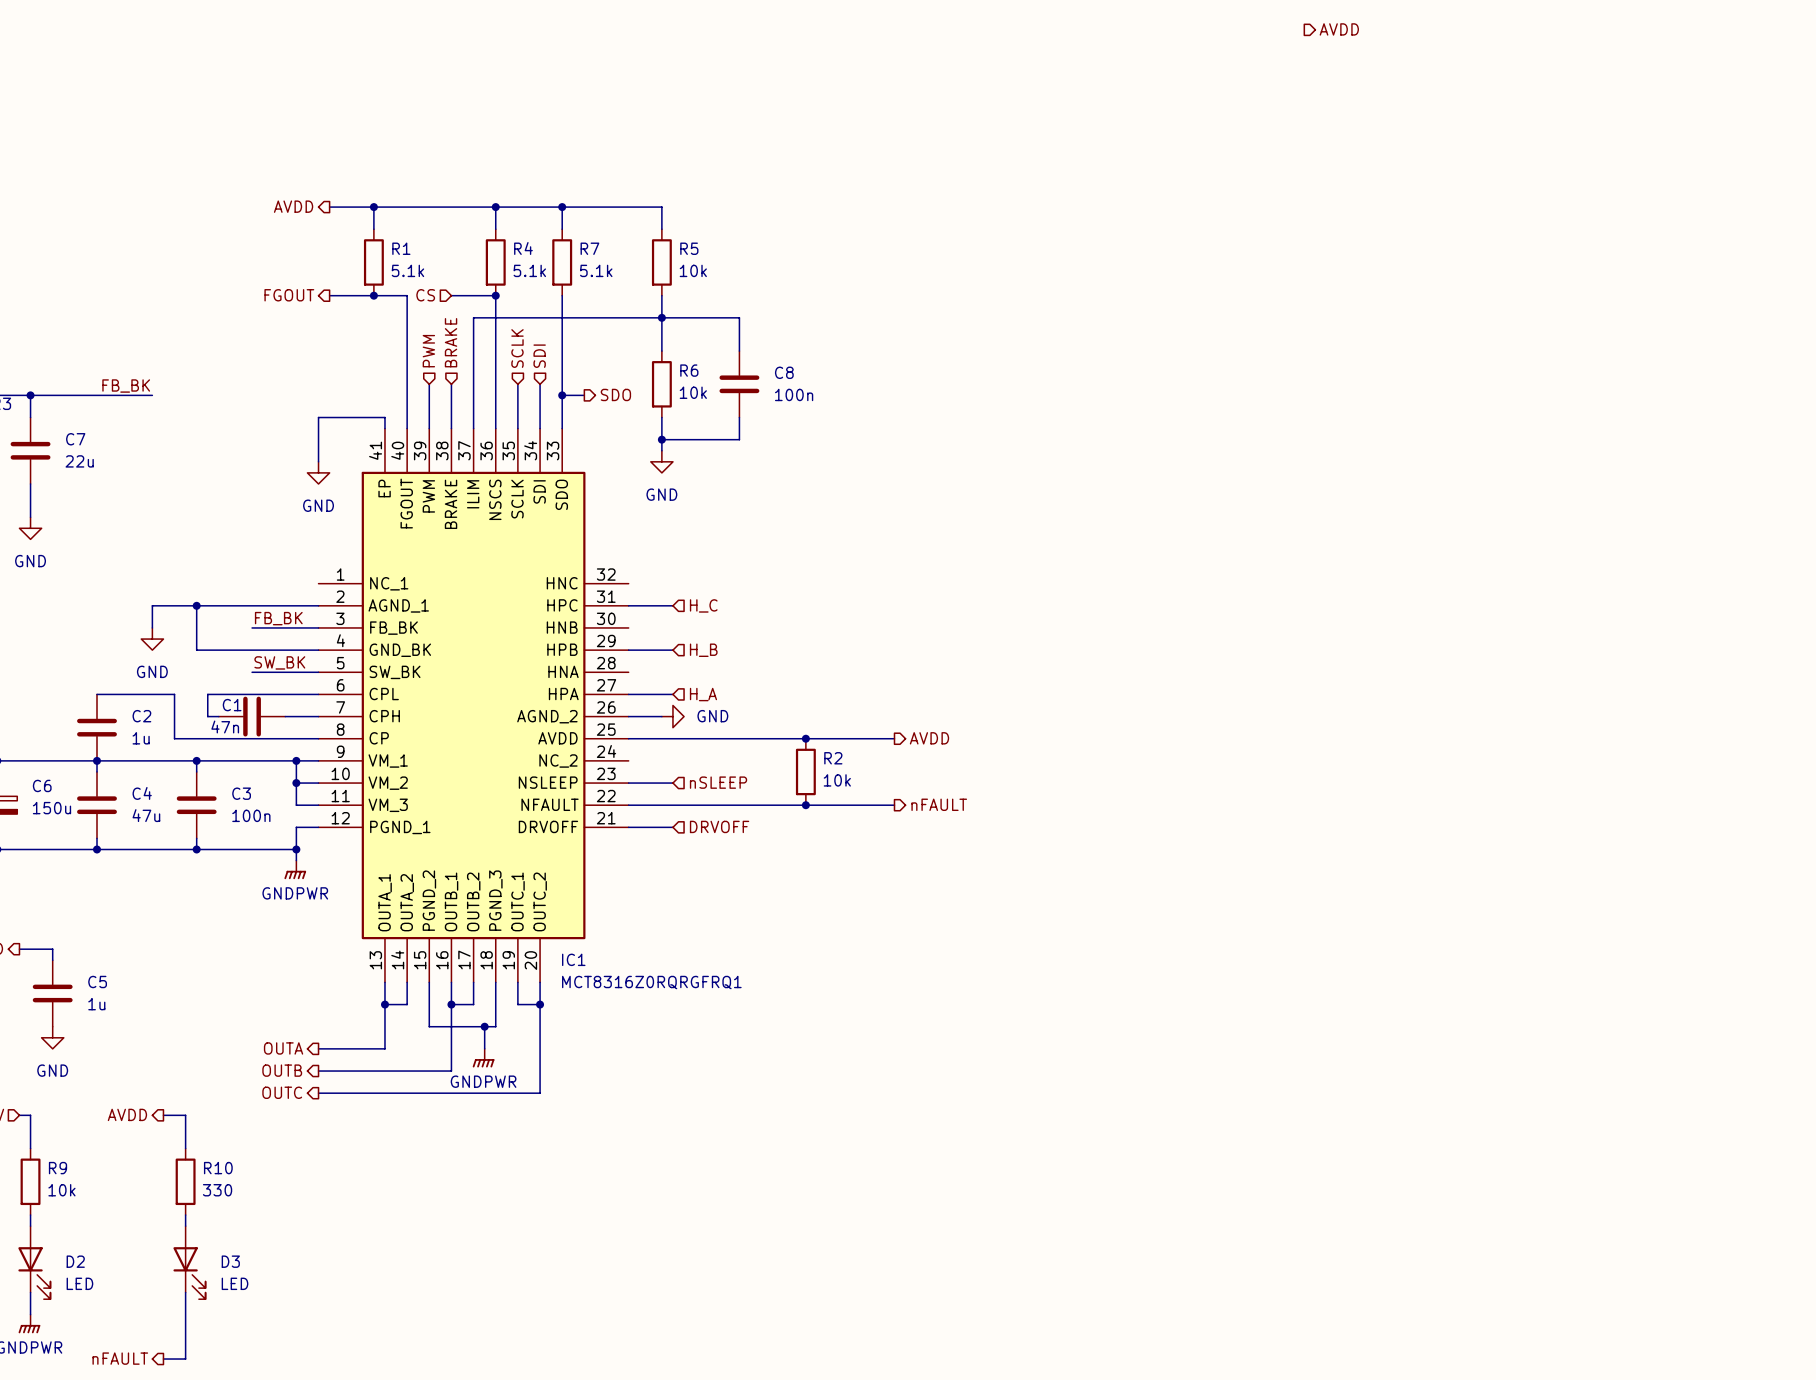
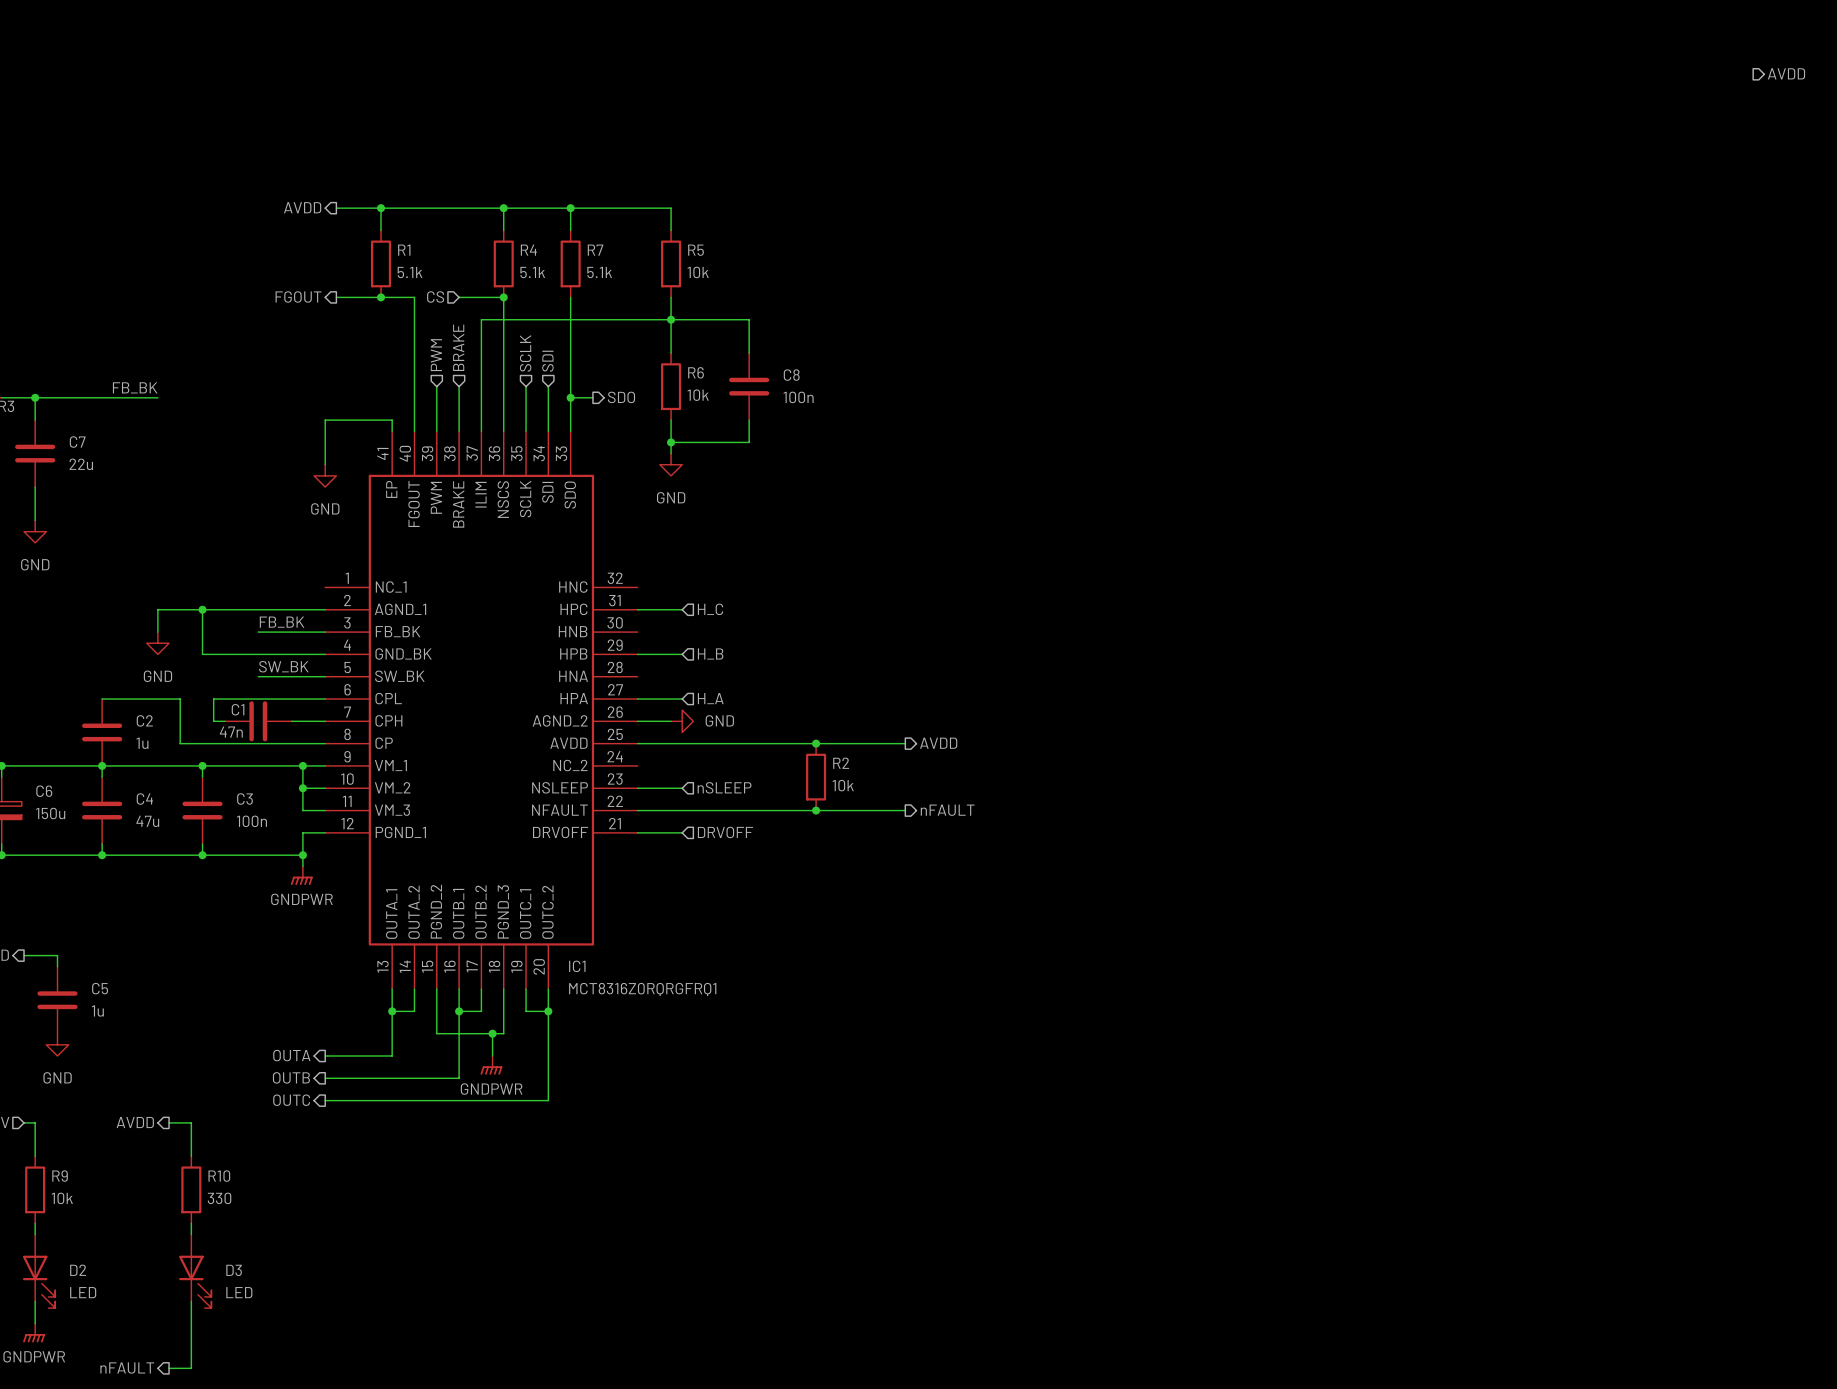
hierarchical label: AVDD (1339, 29) -> none
hierarchical label: none -> AVDD (1786, 73)

